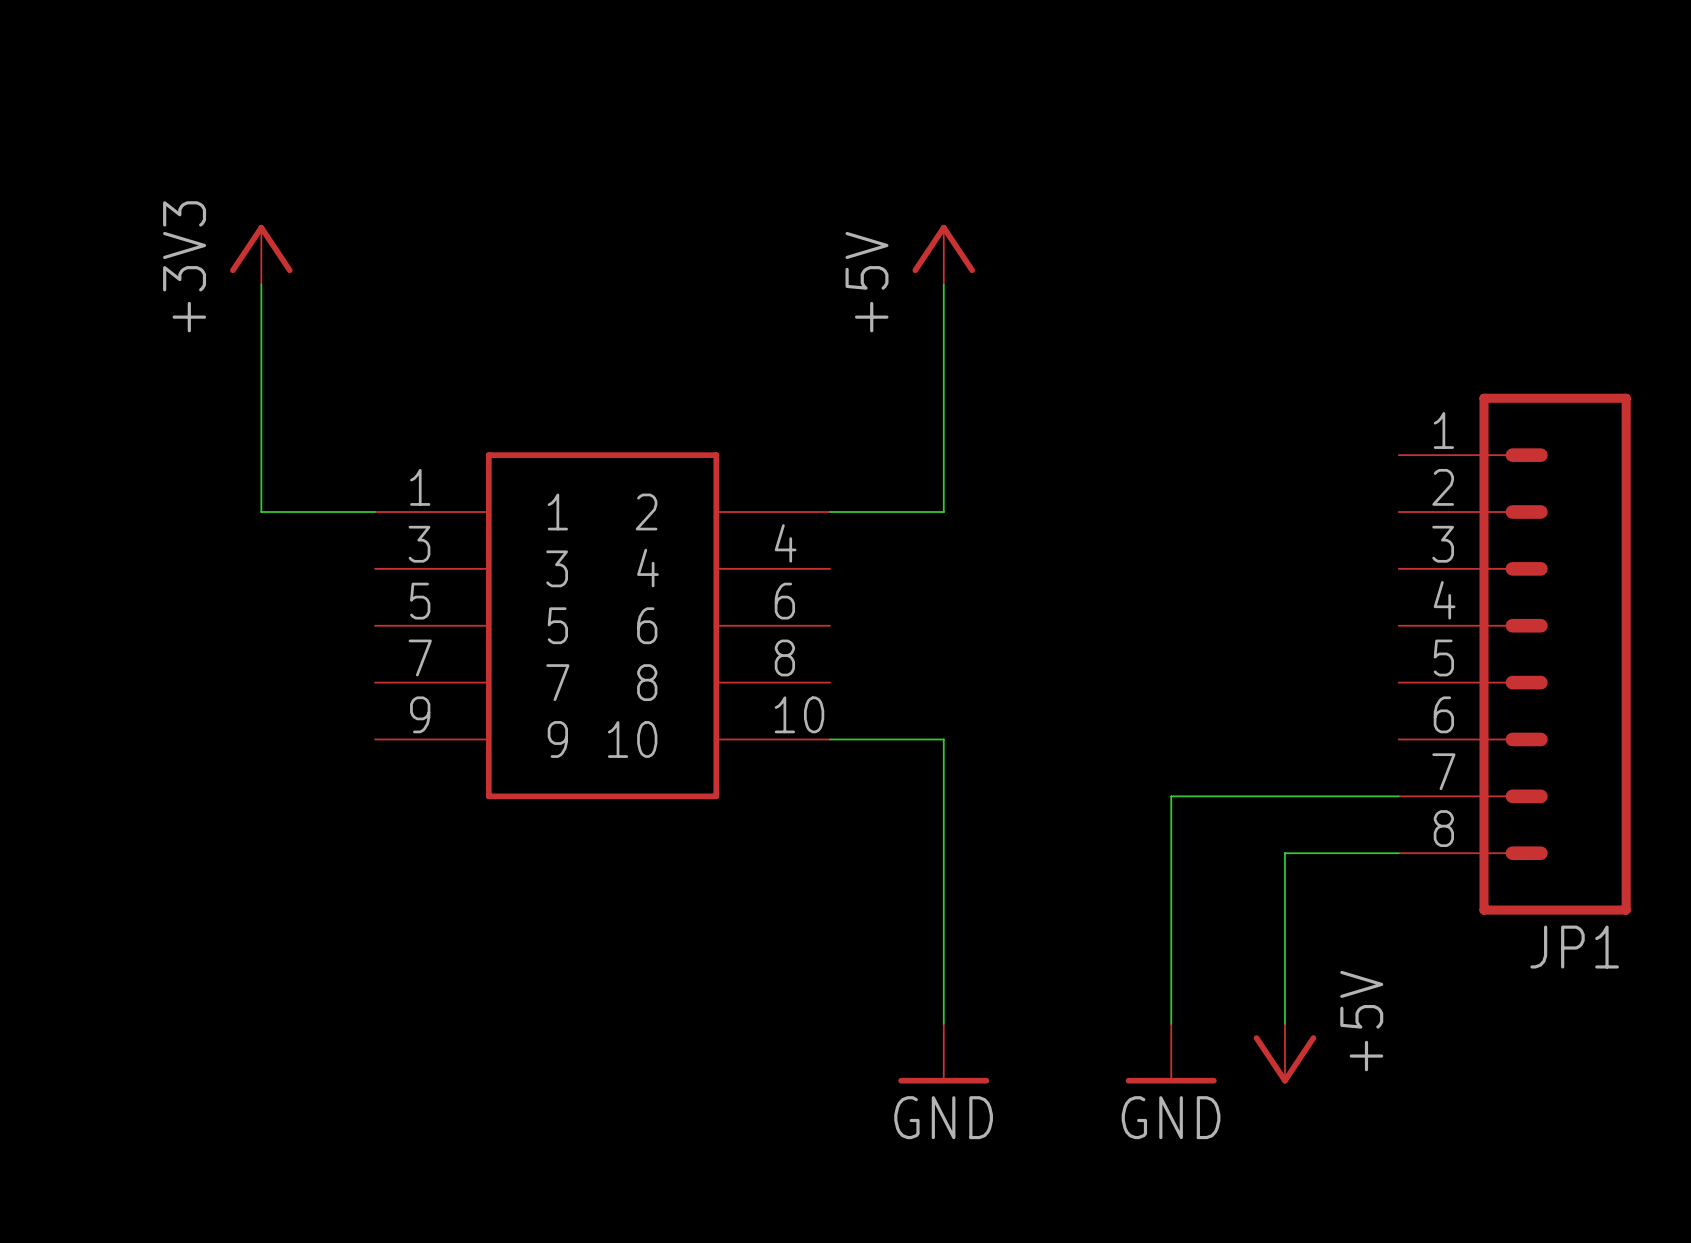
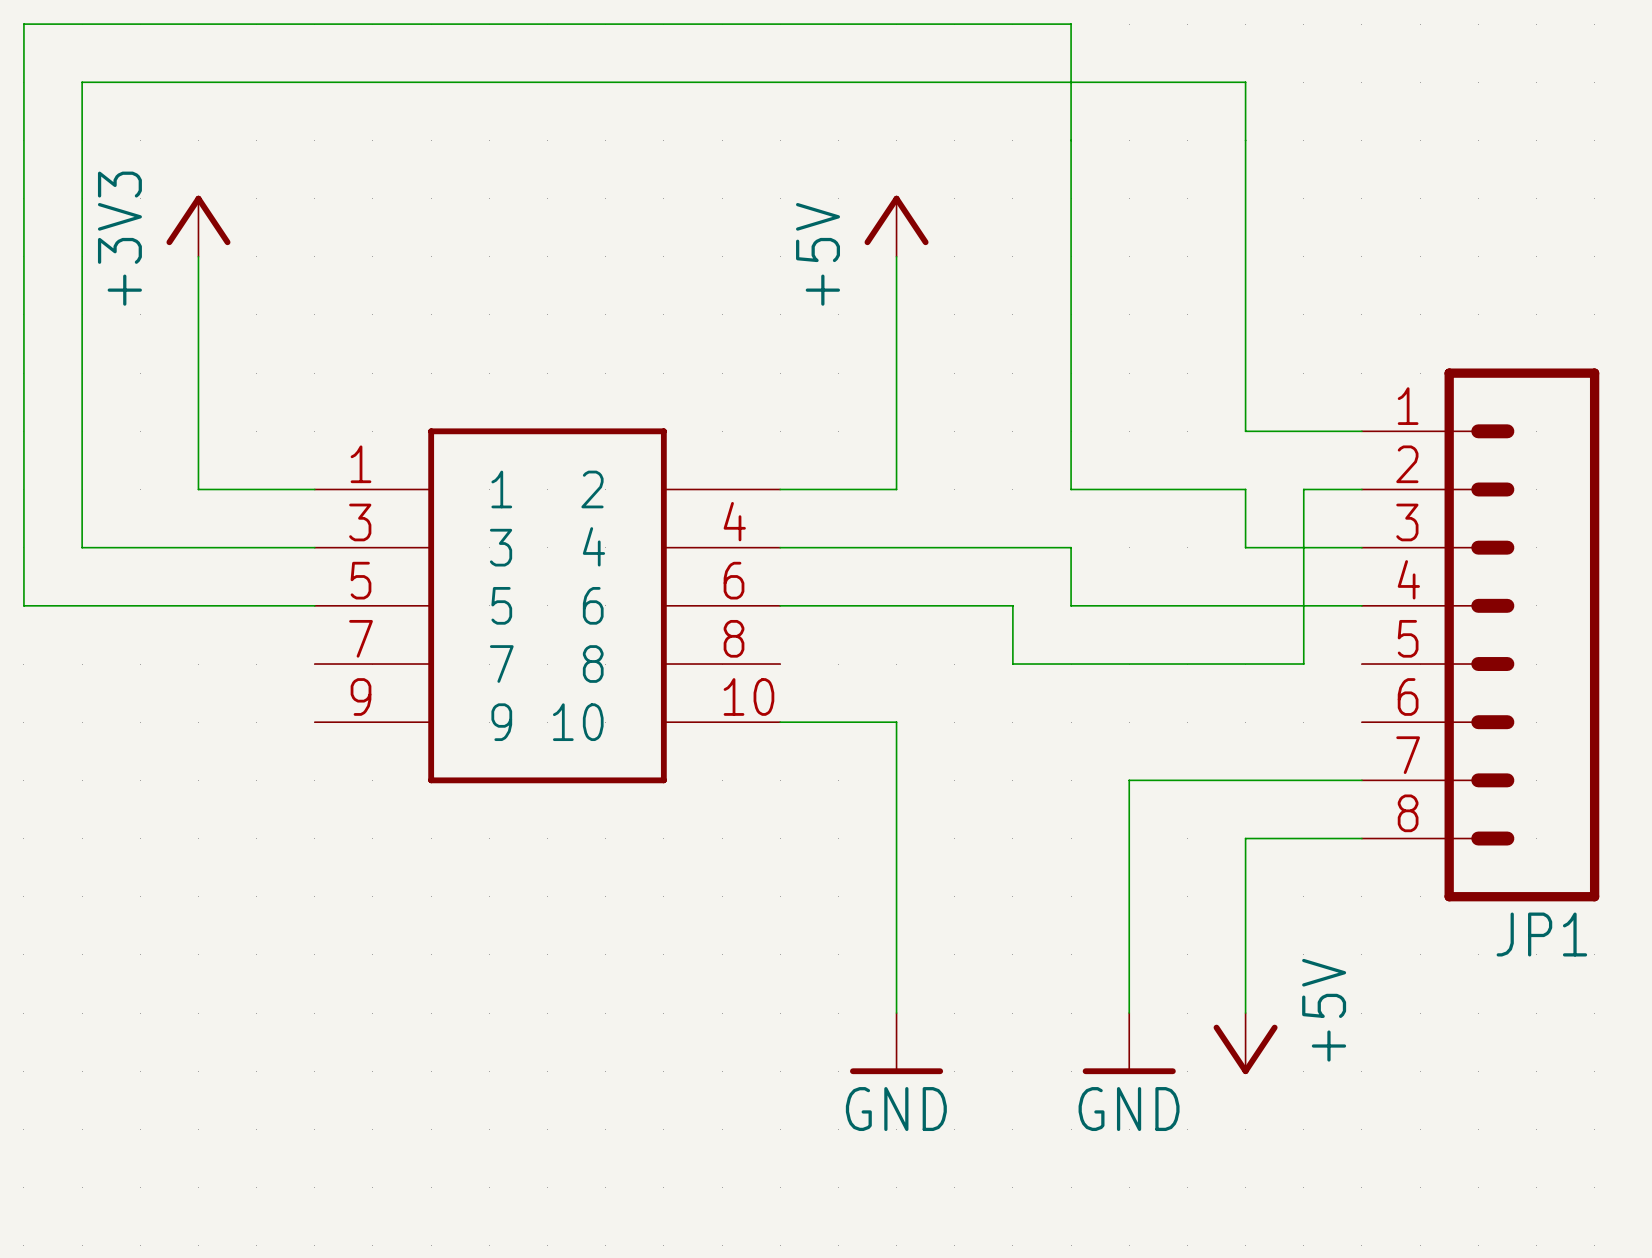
wire: none -> (1361, 431) (1245, 431) (1245, 82) (82, 82) (82, 547) (314, 547)
wire: none -> (1361, 489) (1303, 489) (1303, 664) (1012, 664) (1012, 605) (780, 605)
wire: none -> (780, 547) (1071, 547) (1071, 605) (1361, 605)
wire: none -> (1361, 547) (1245, 547) (1245, 489) (1071, 489) (1071, 24) (23, 24) (23, 605) (314, 605)

